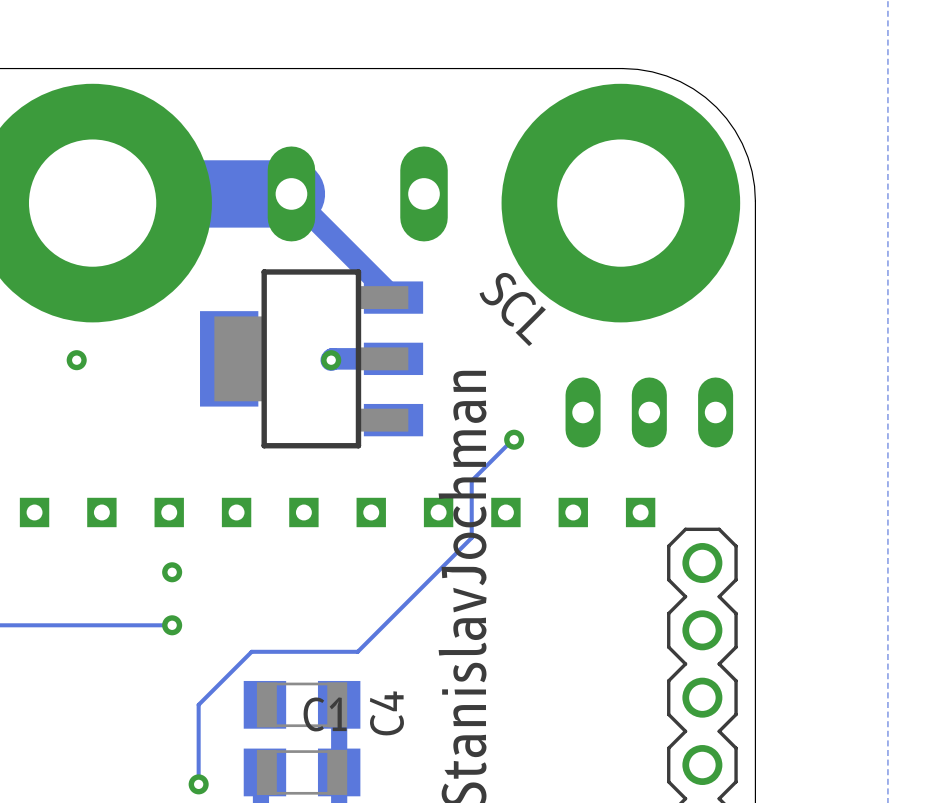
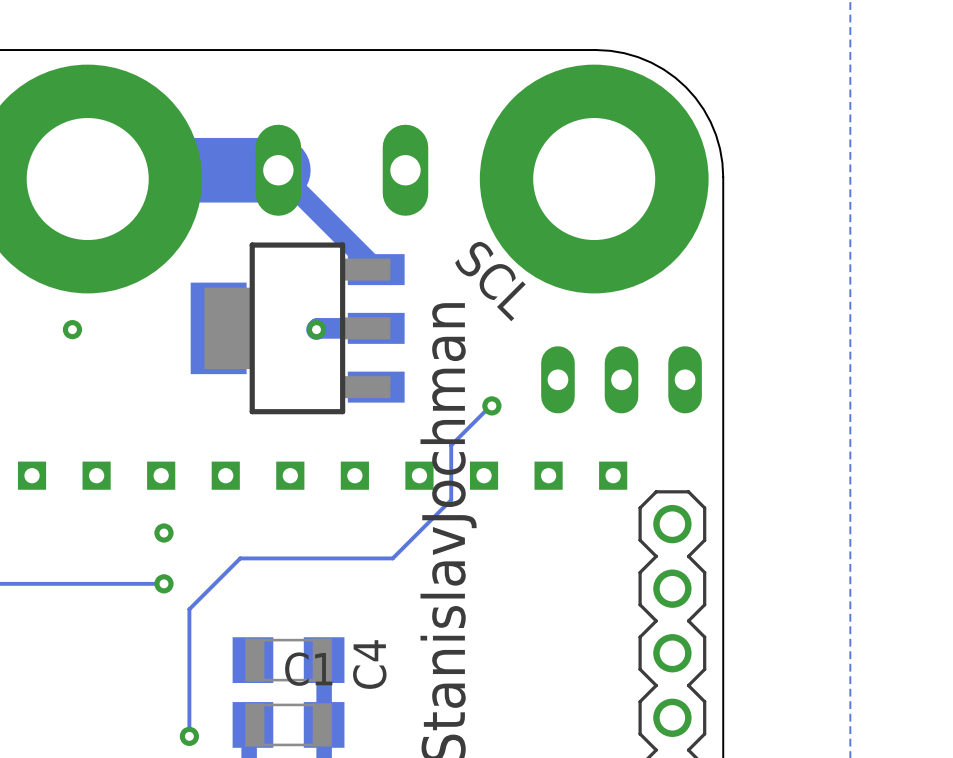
track: (410, 598) (357, 651) (251, 651) (198, 704) -> (392, 558) (240, 558) (189, 609) (189, 660)

